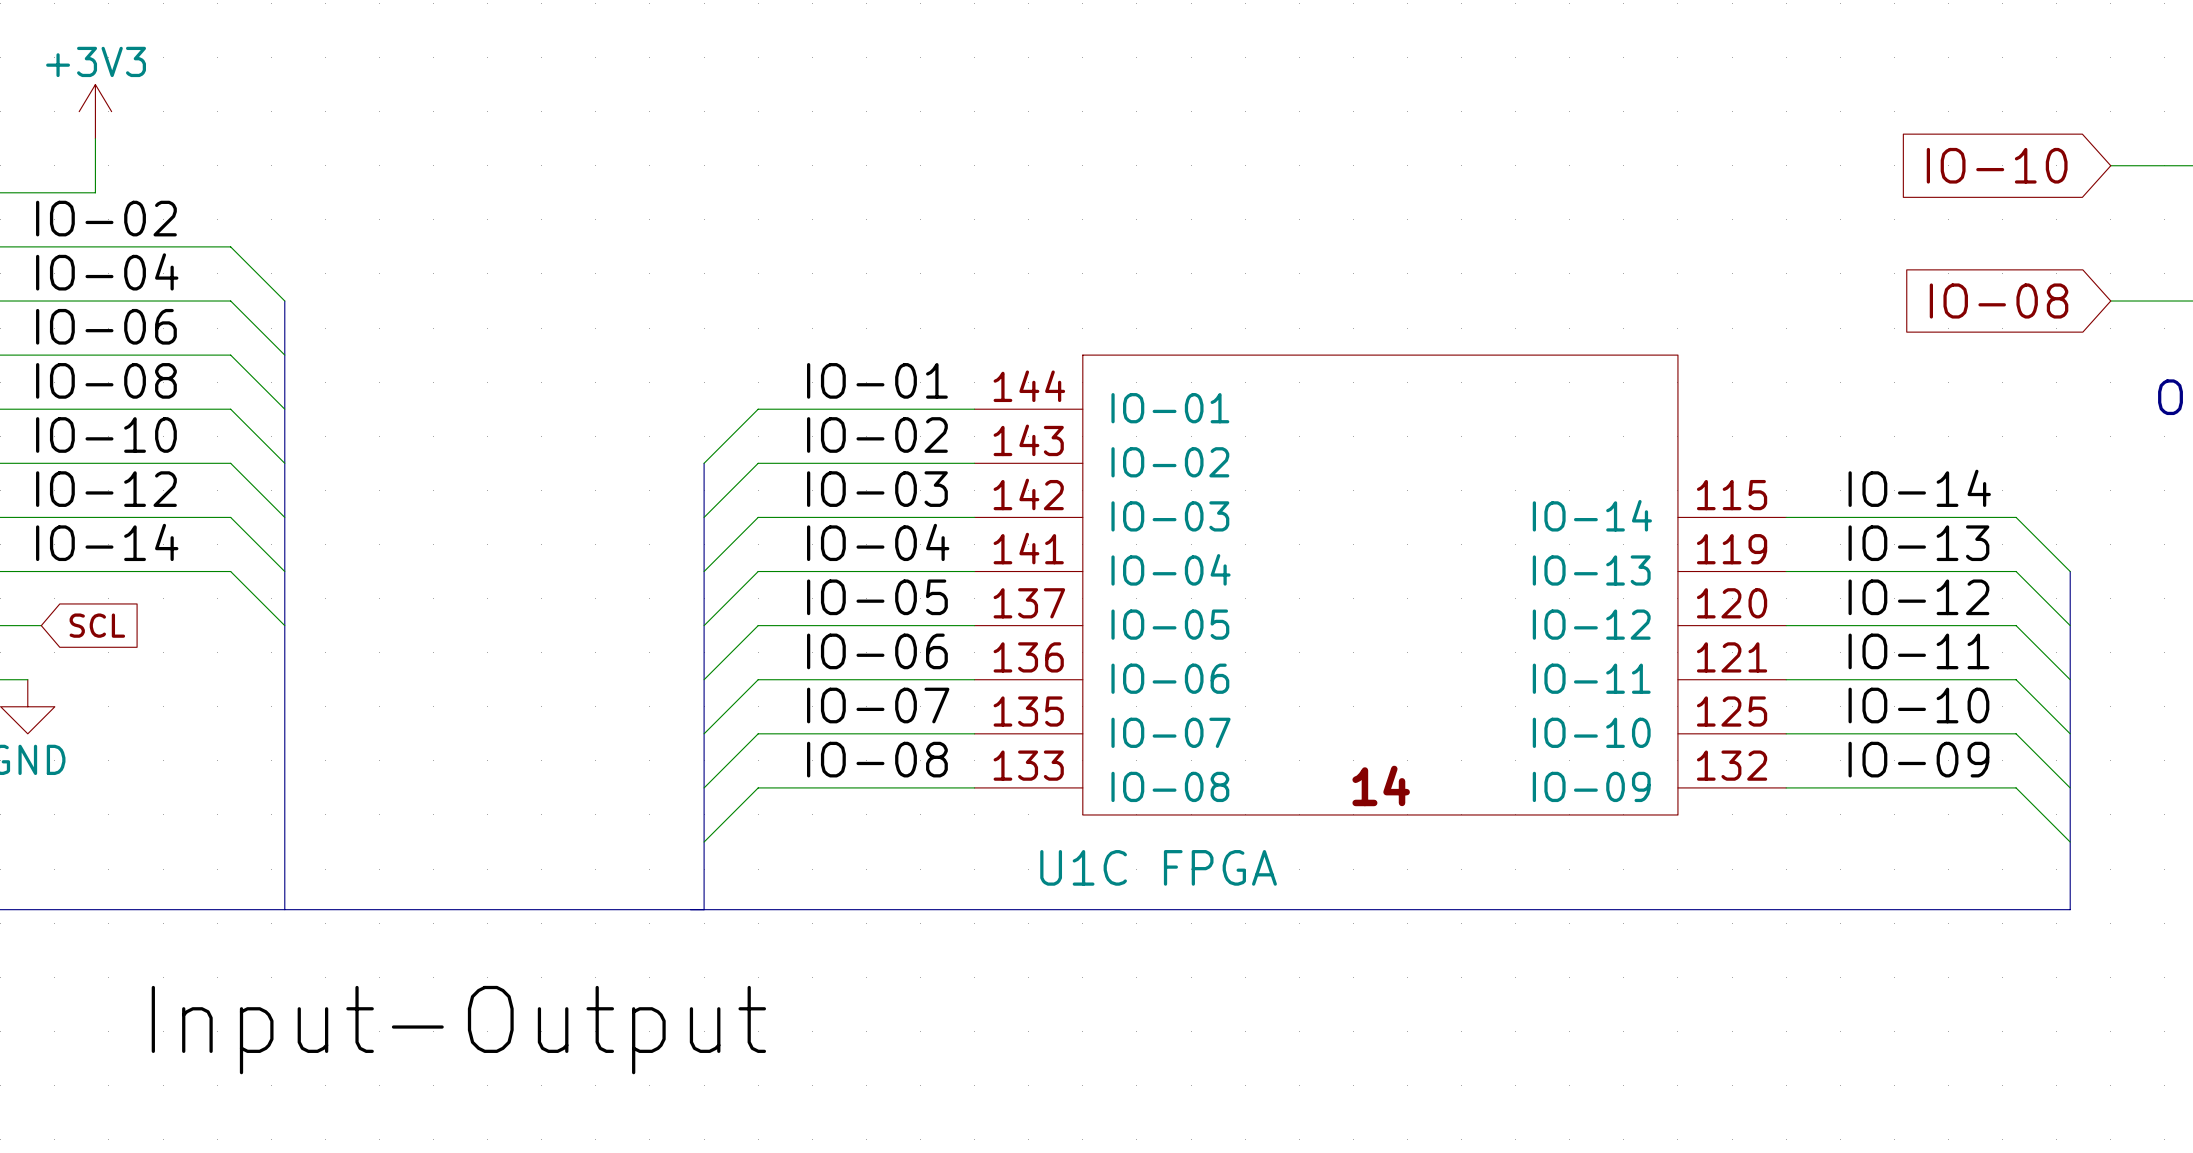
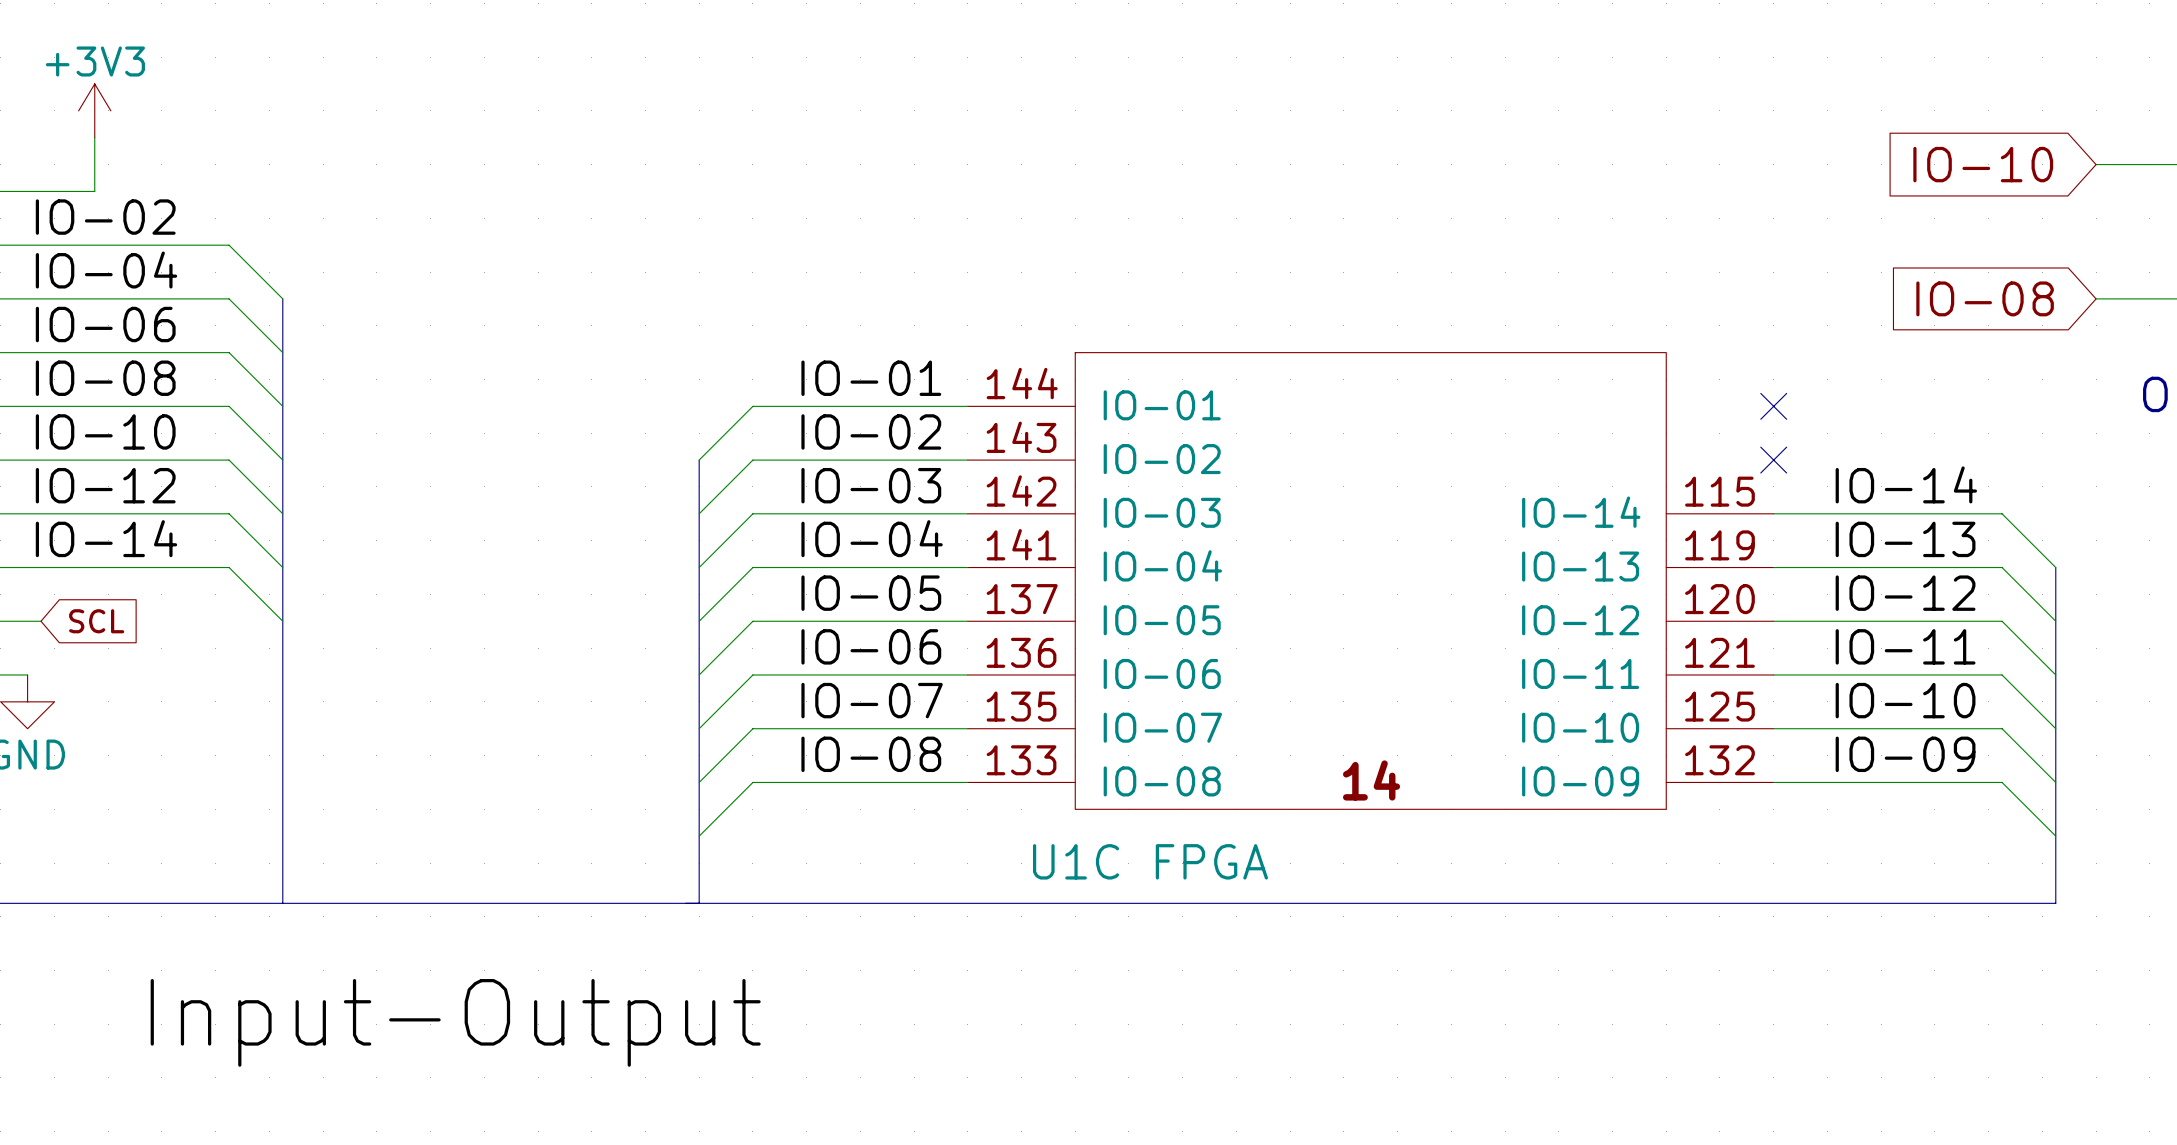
no-connect mark: none -> (1773, 406)
no-connect mark: none -> (1773, 460)

